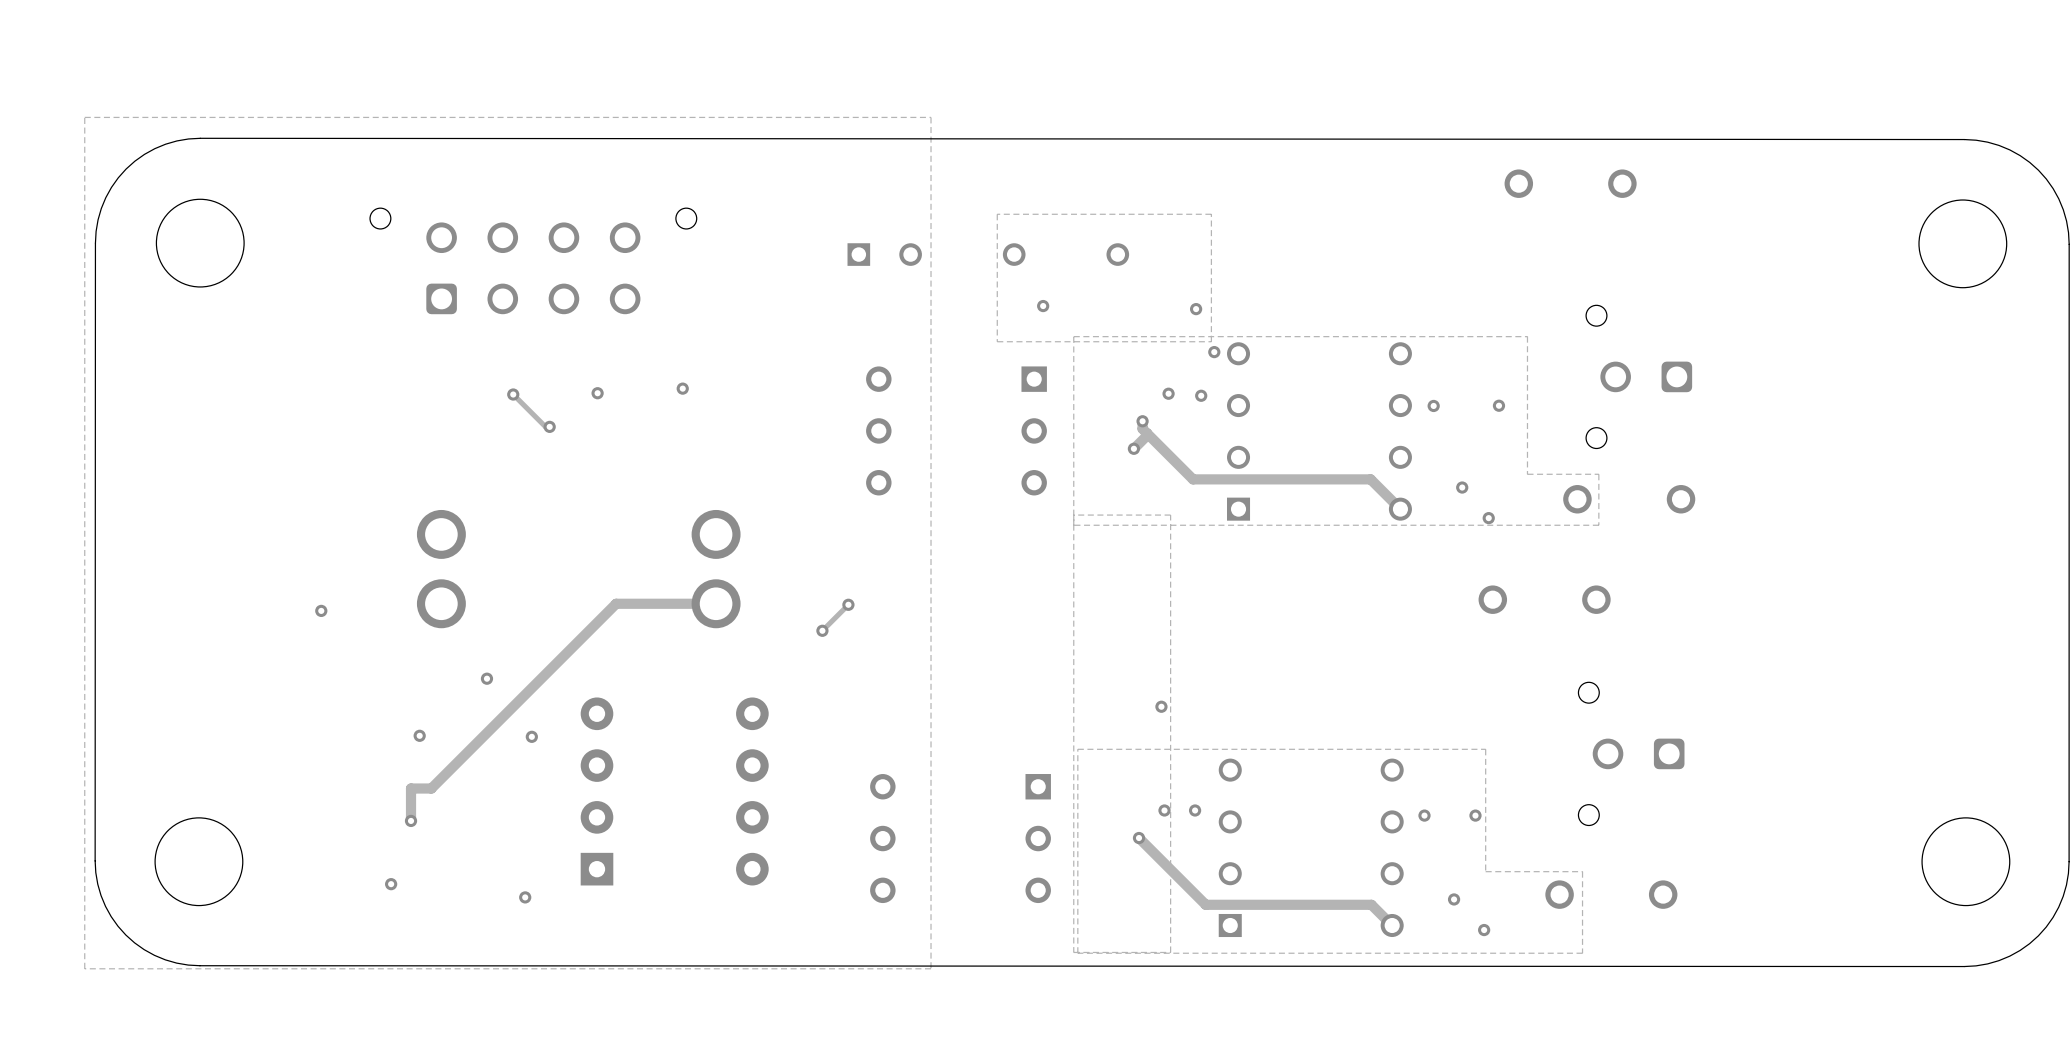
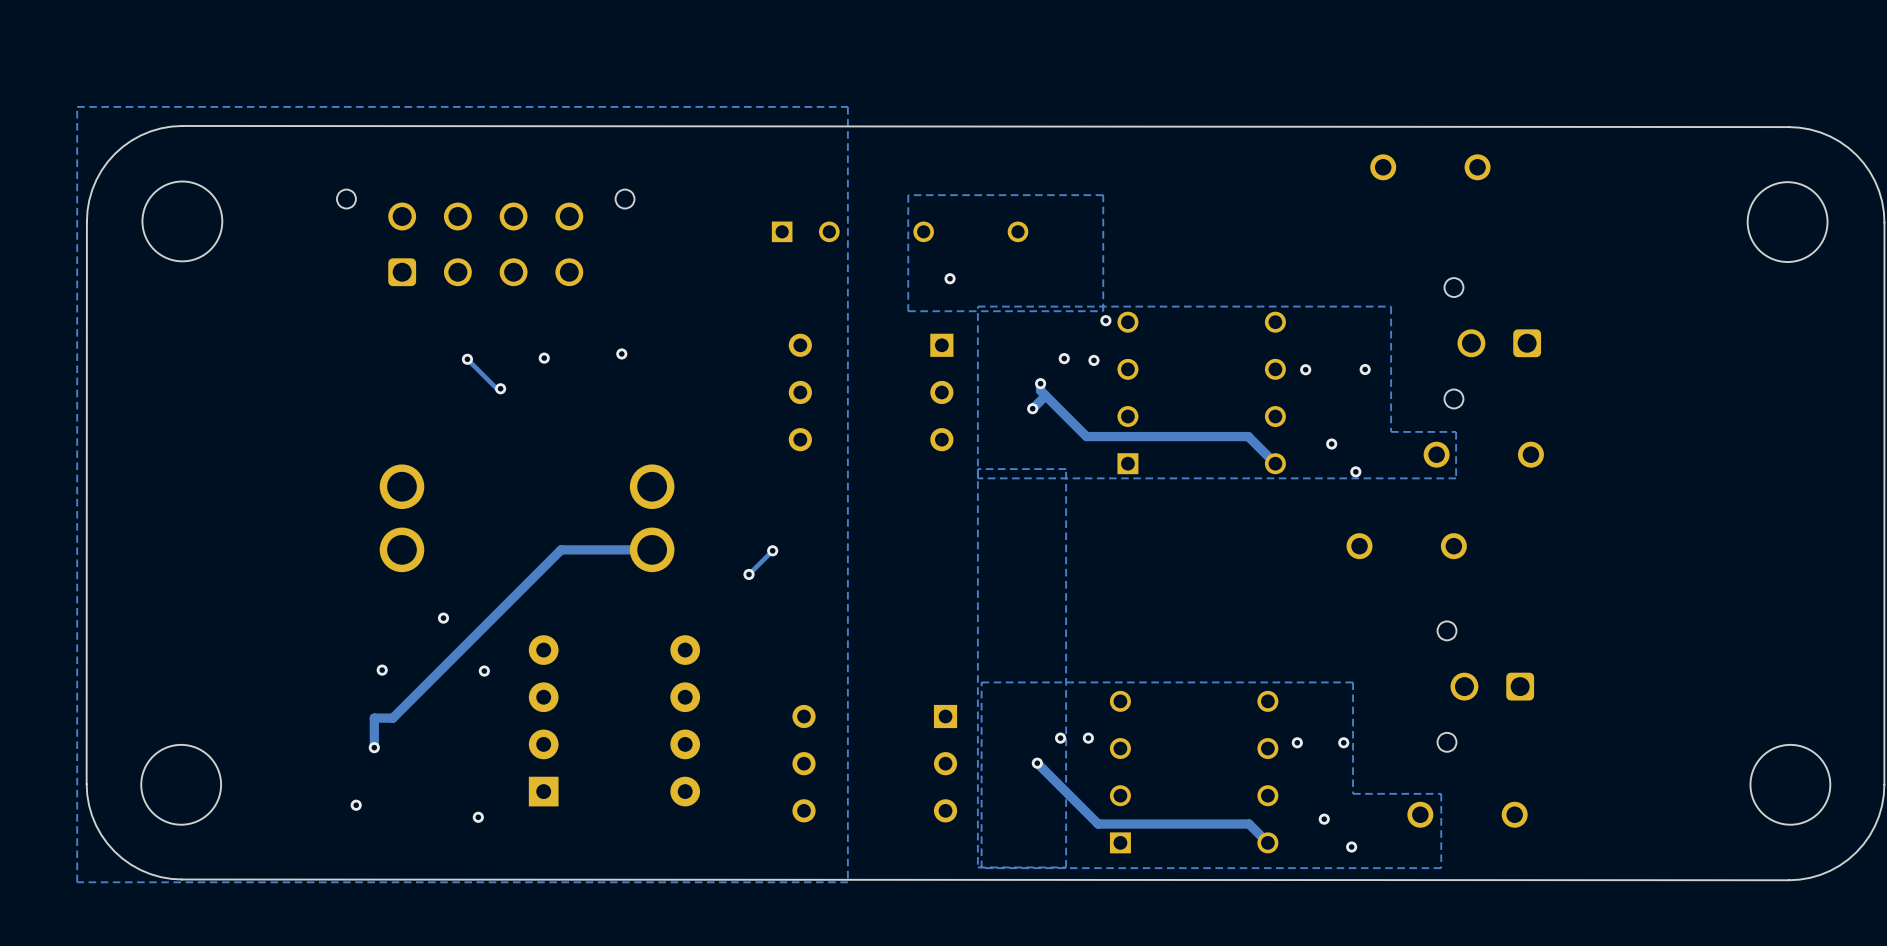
via: (1196, 309) -> none
via: (321, 610) -> none
via: (1161, 706) -> none

